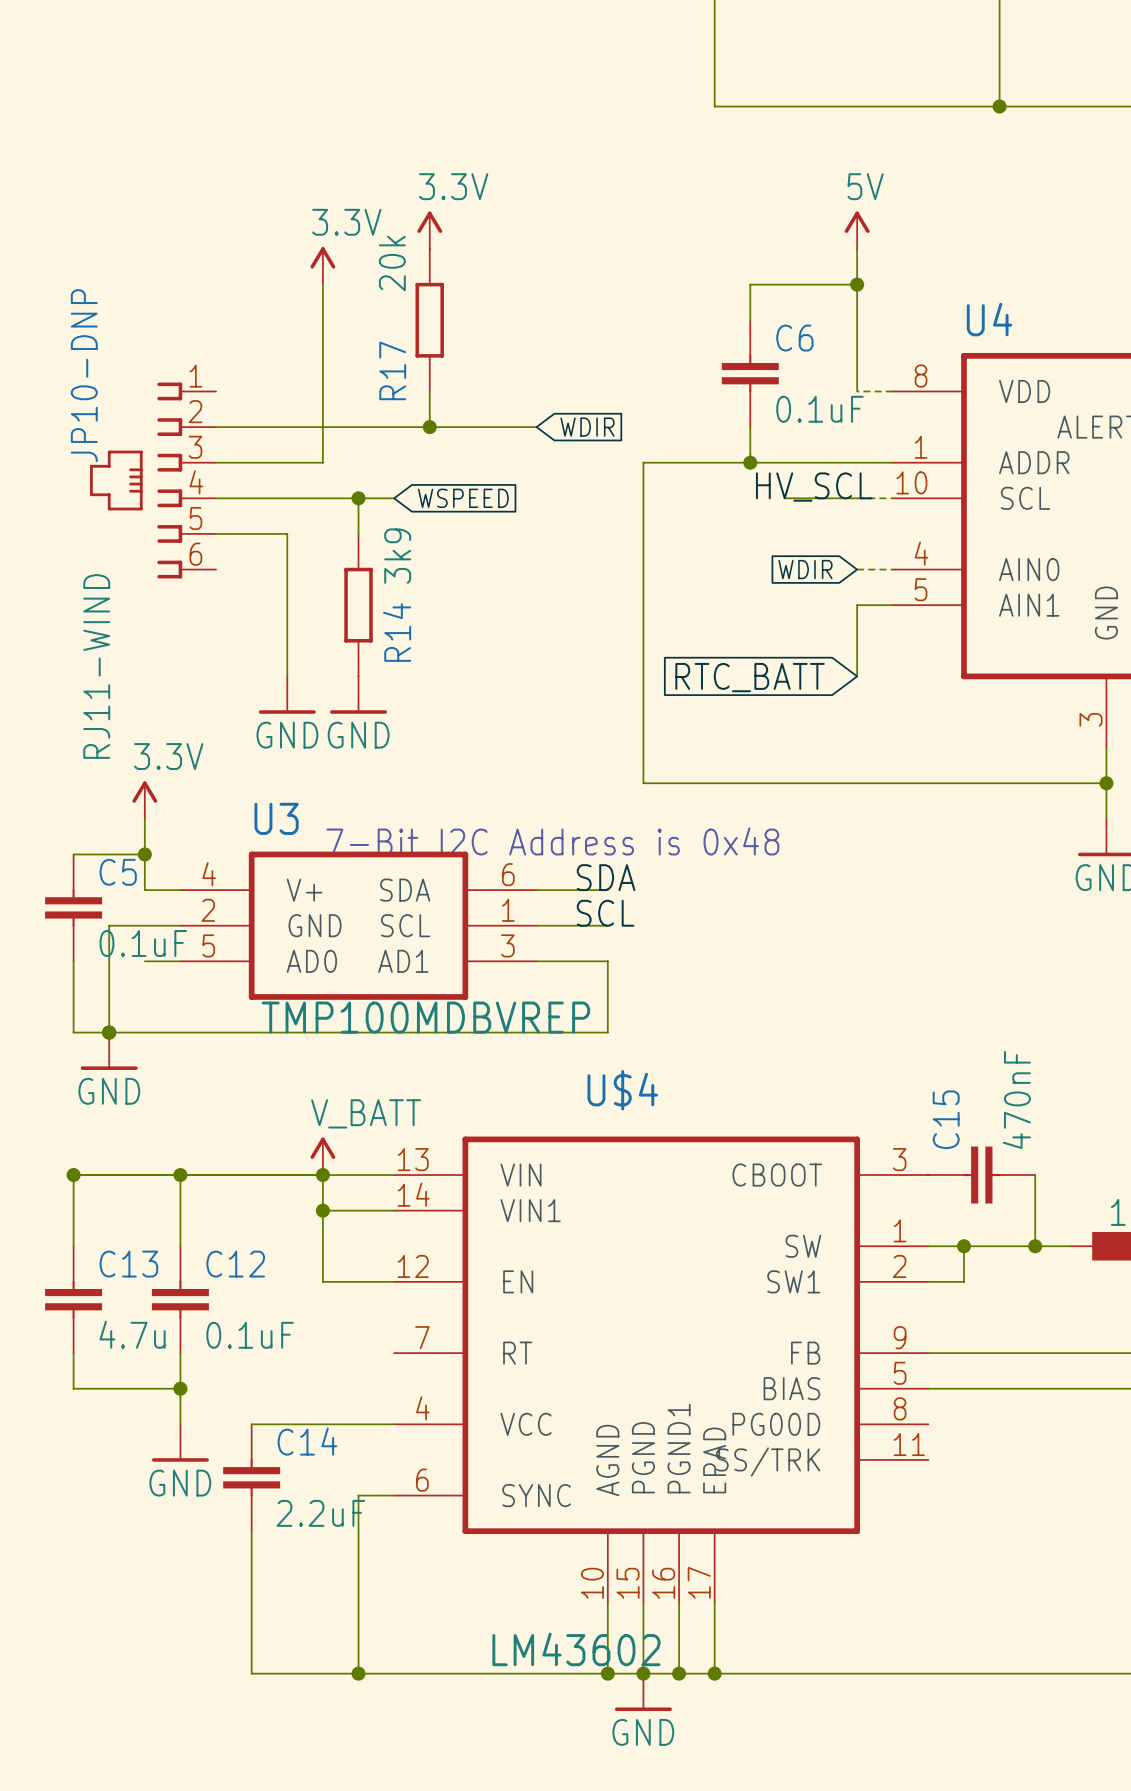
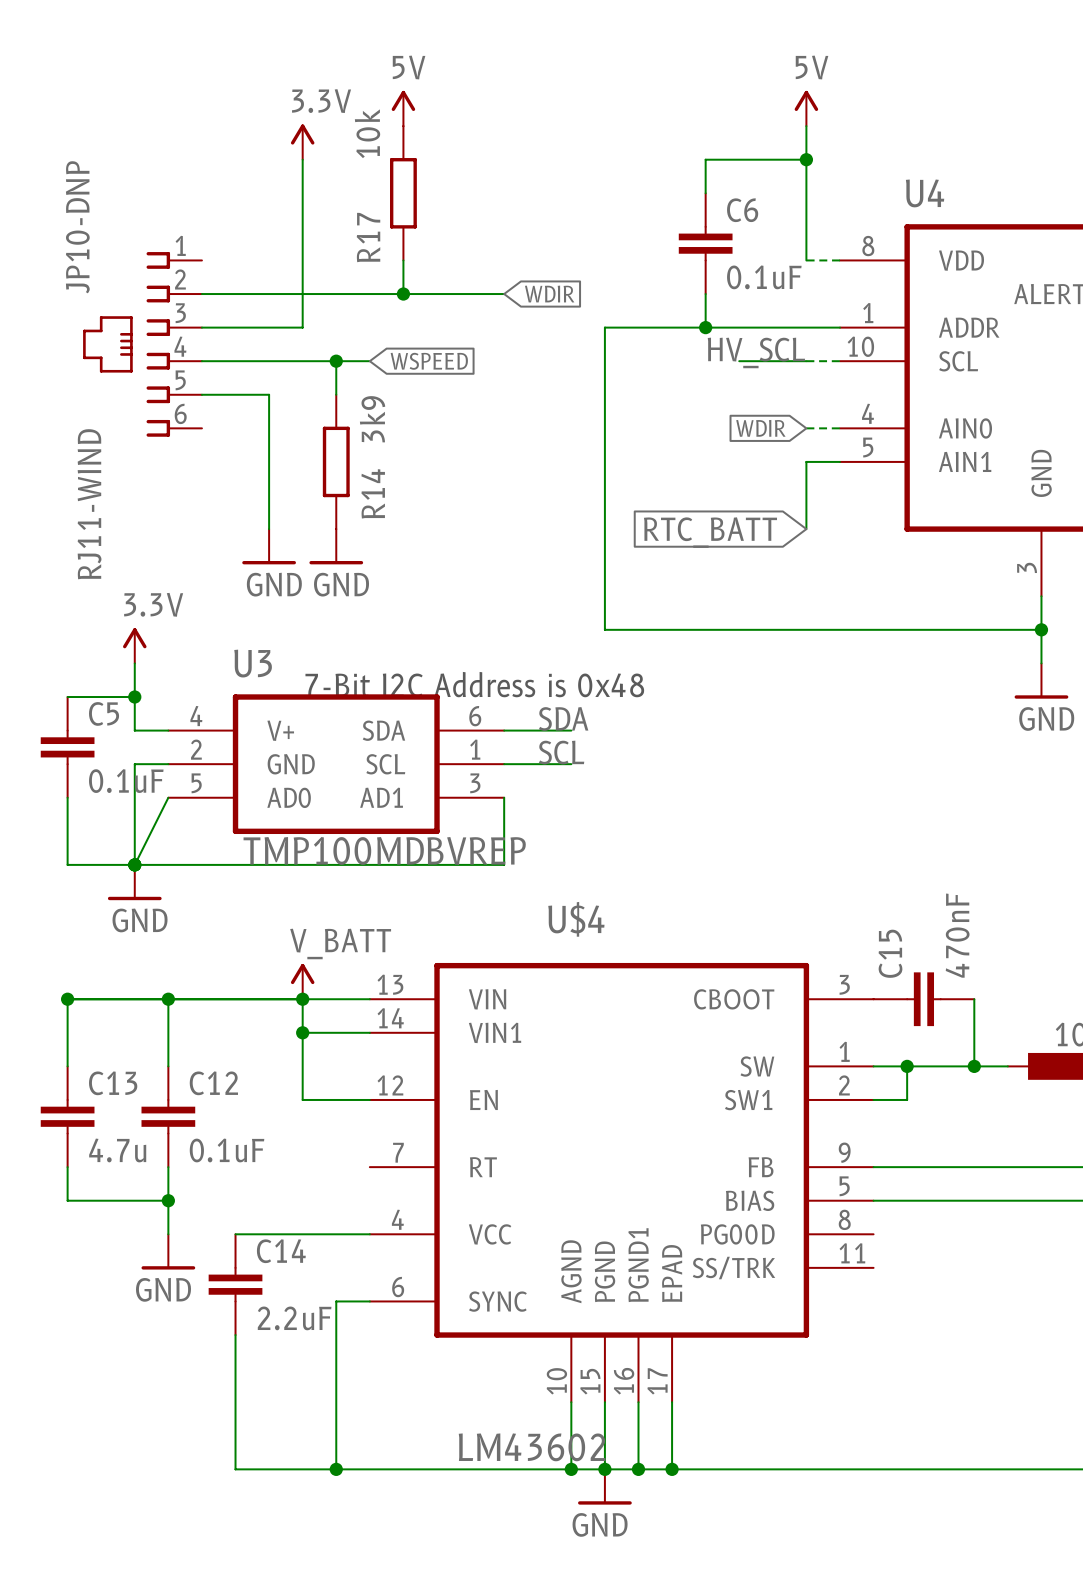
power symbol: 3.3V (429, 230) -> 5V (403, 108)
R17 value: 20k (392, 263) -> 10k (367, 133)
wire: (144, 925) (109, 925) (109, 1032) -> none
wire: (144, 961) (180, 961) -> (134, 764) (134, 864) (168, 797)
wire: (536, 961) (607, 961) (607, 1032) (536, 1032) -> (504, 797) (504, 864)
junction position: (109, 1032) -> (134, 864)
power symbol position: GND (109, 1051) -> GND (134, 882)

